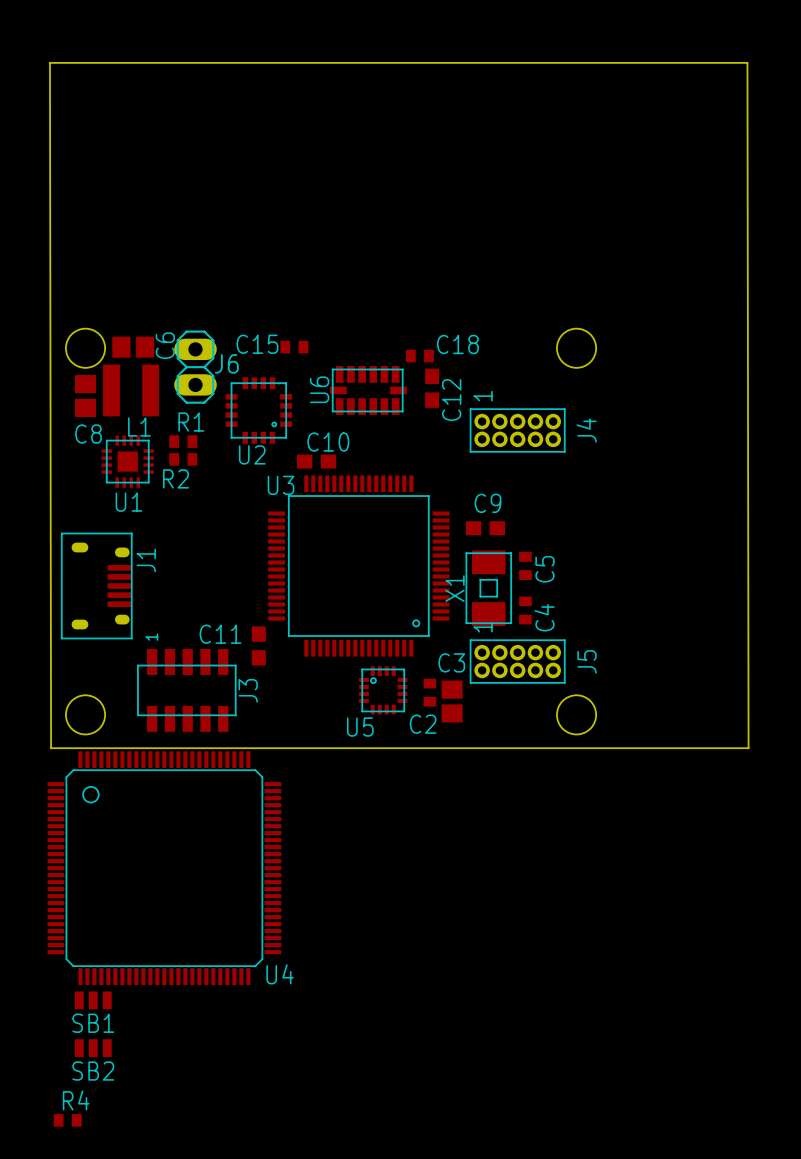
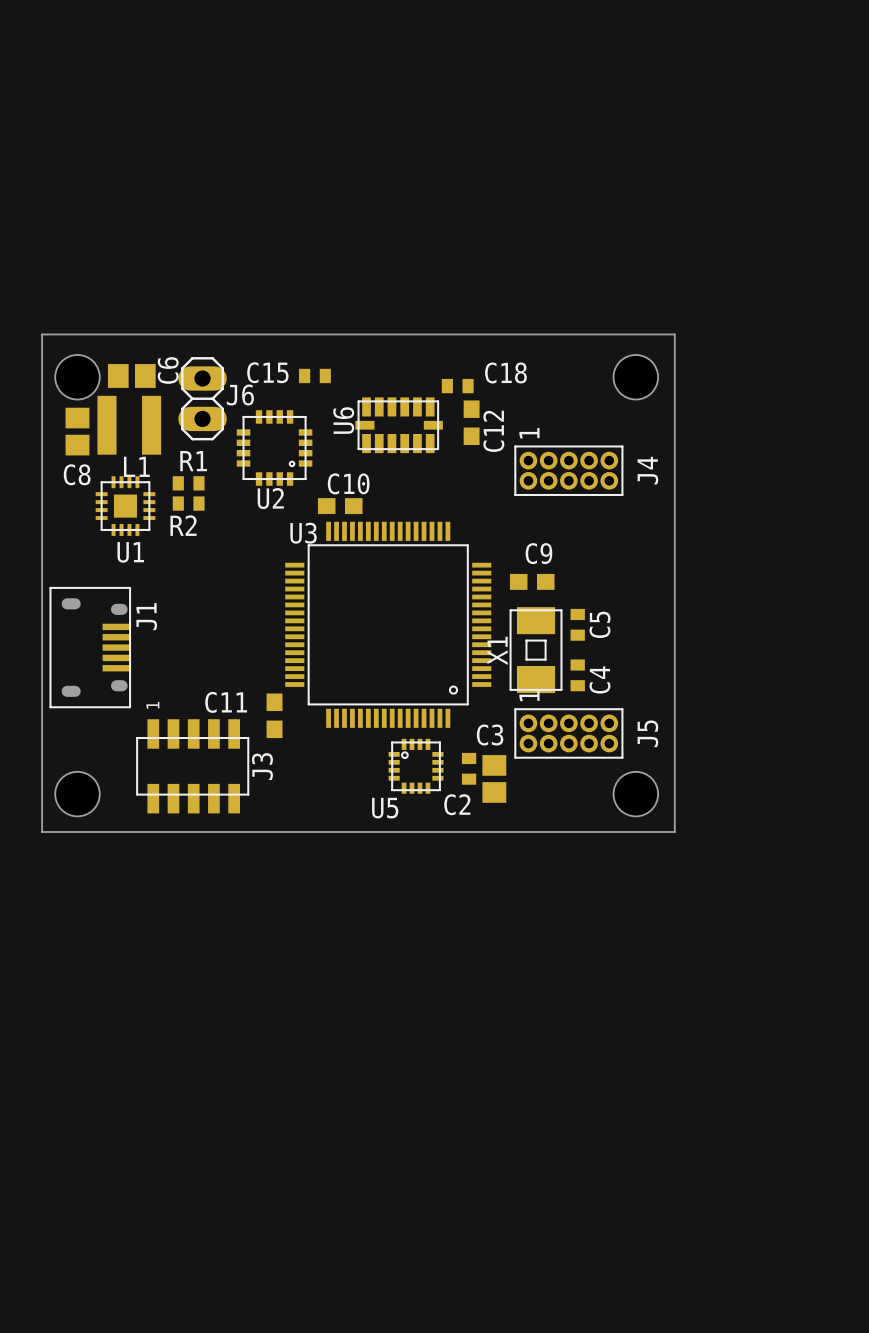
board edge: (54, 748) (51, 748) (49, 62) (747, 62) (748, 748) (610, 748) -> (42, 832) (42, 334) (674, 334) (674, 832)
U4: (164, 868) -> none
SB1: (93, 1000) -> none
SB2: (93, 1048) -> none
R4: (67, 1120) -> none

